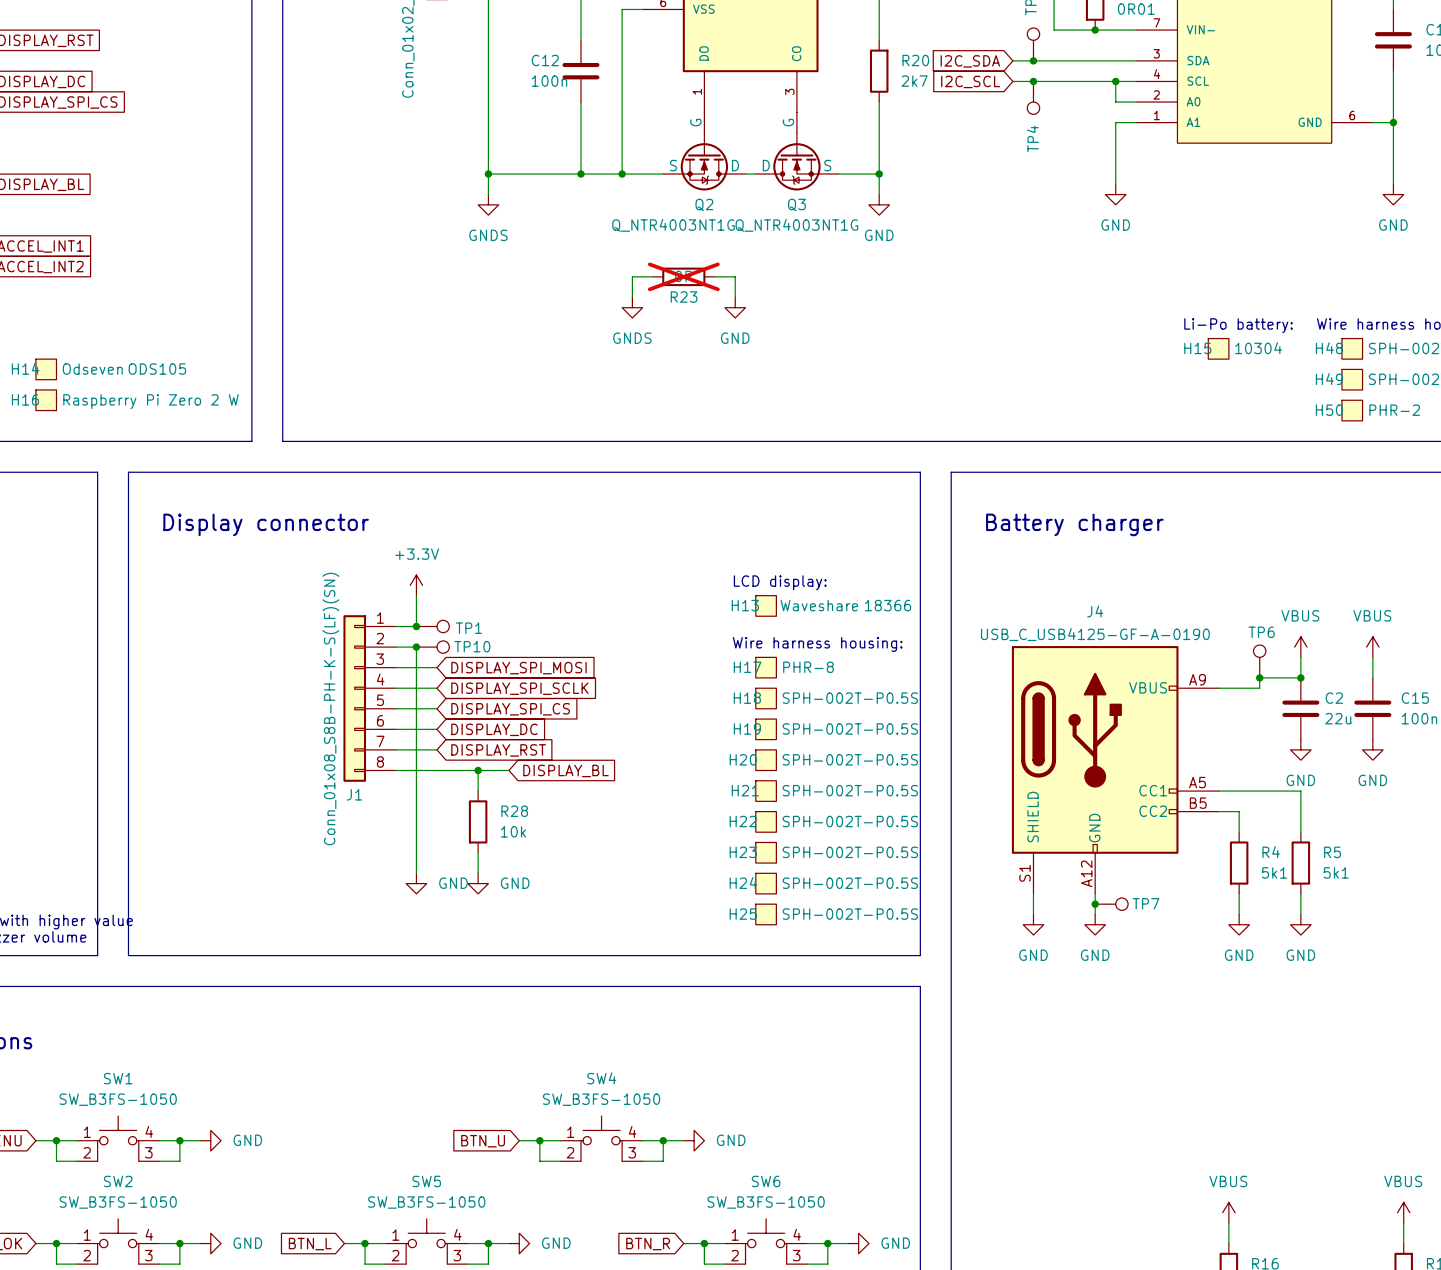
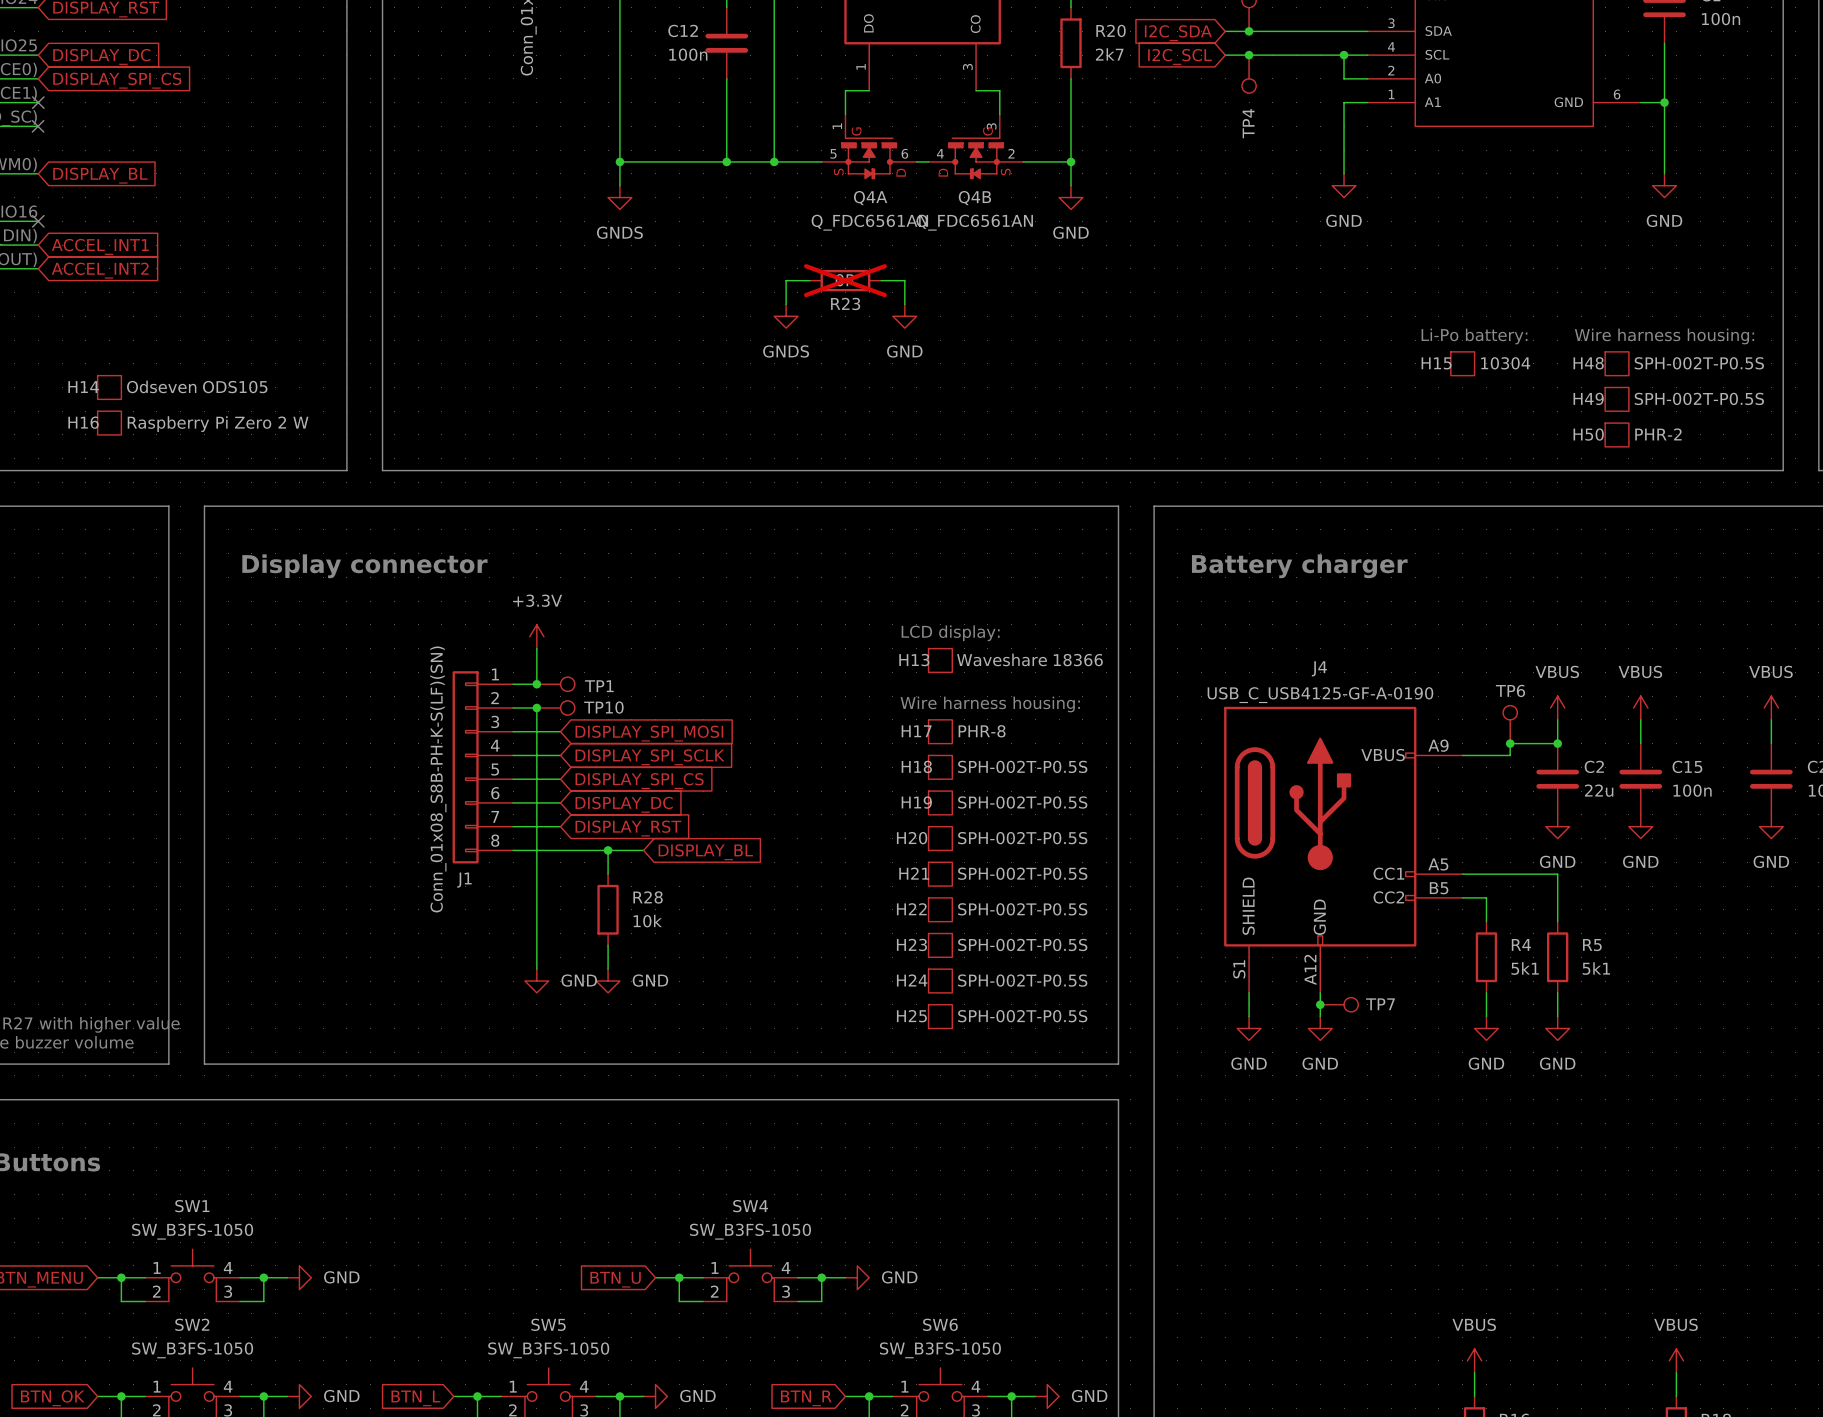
wire: none -> (869, 90) (845, 90) (845, 114)
wire: none -> (976, 90) (999, 90) (999, 114)
Q2: Q_NTR4003NT1G (704, 151) -> none
Q3: Q_NTR4003NT1G (796, 151) -> none
Q4A: none -> Q_FDC6561AN (869, 146)
Q4B: none -> Q_FDC6561AN (976, 146)

